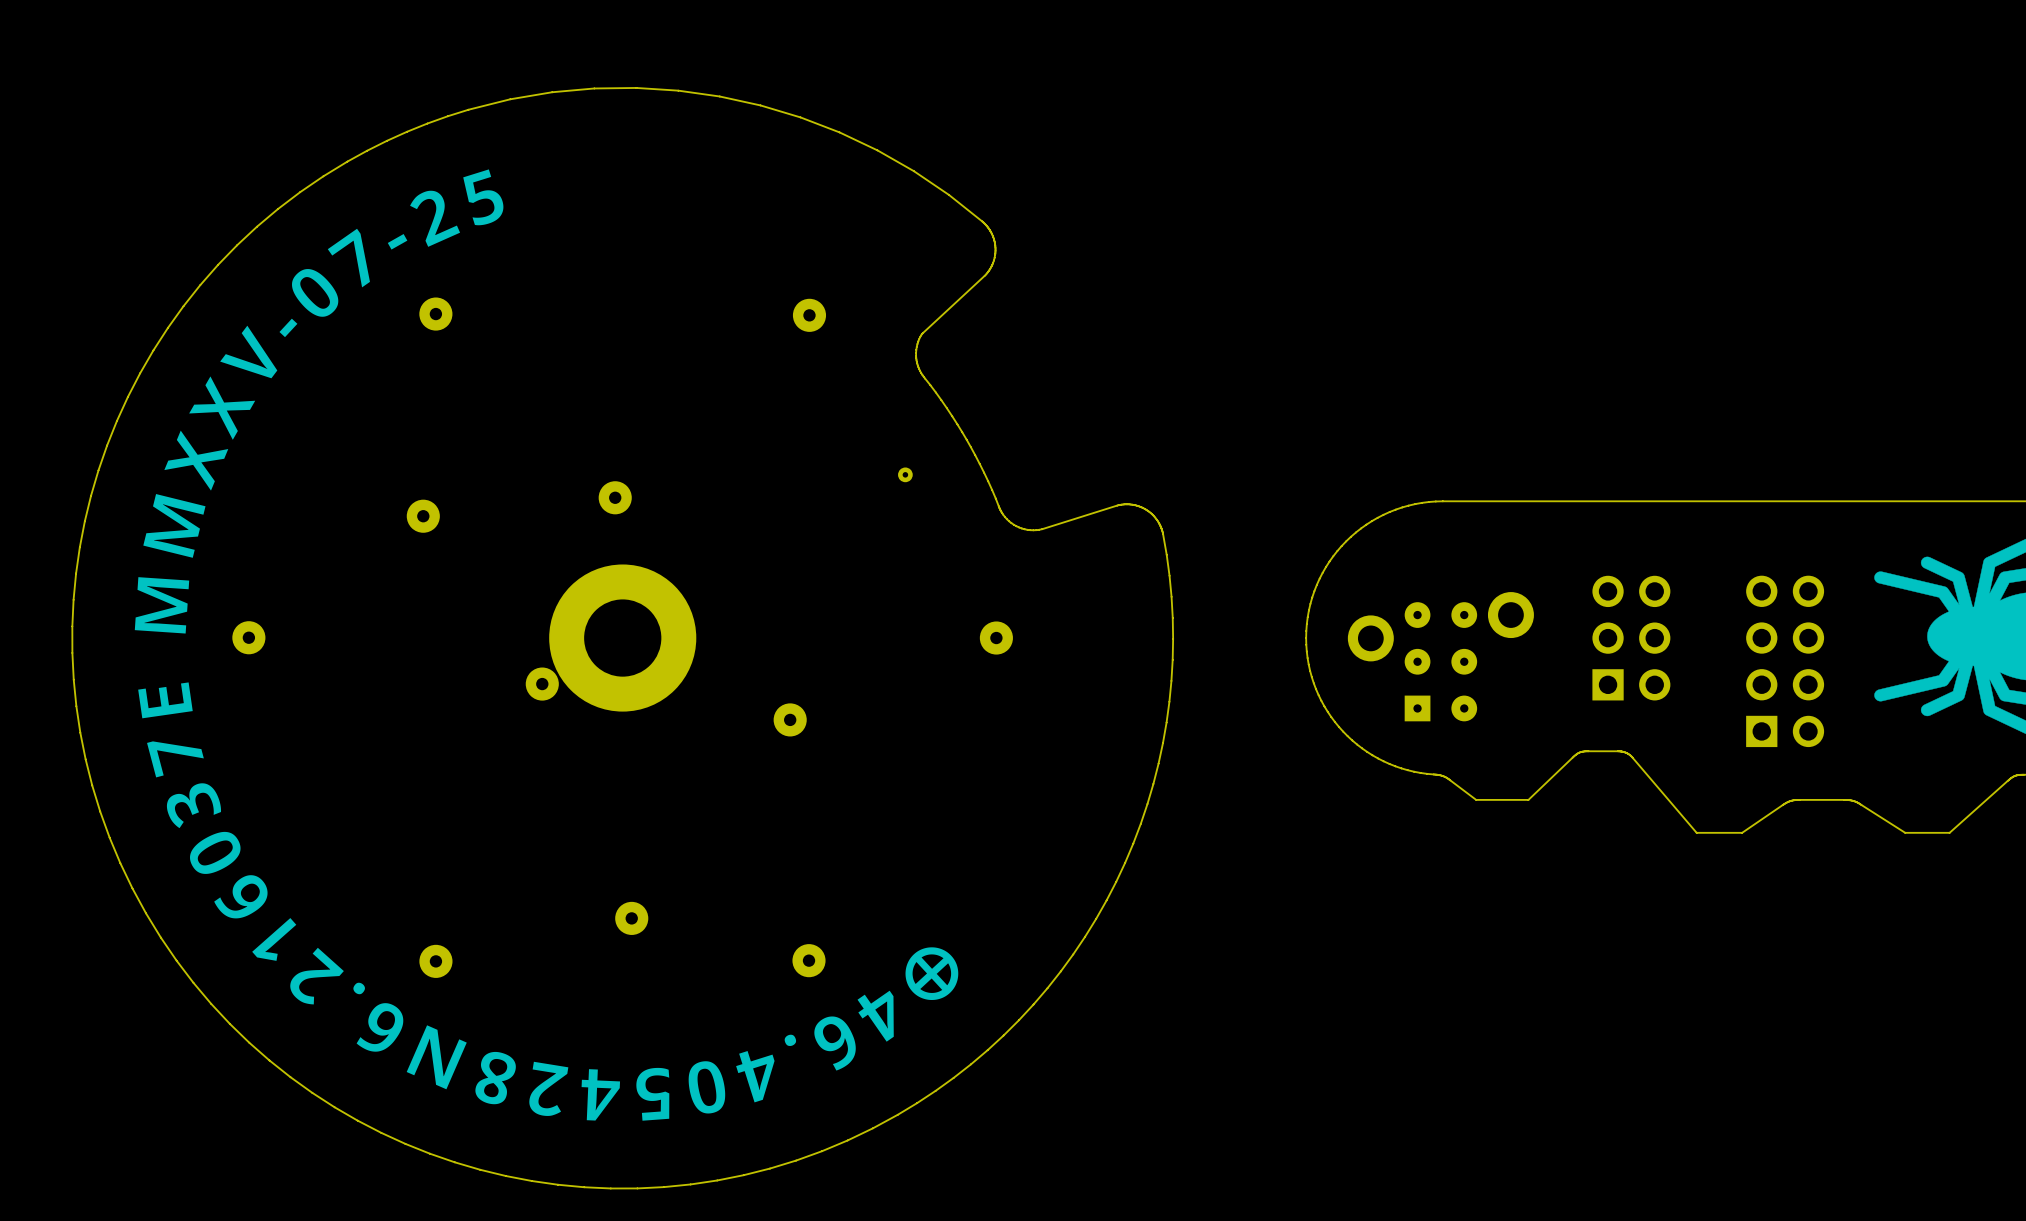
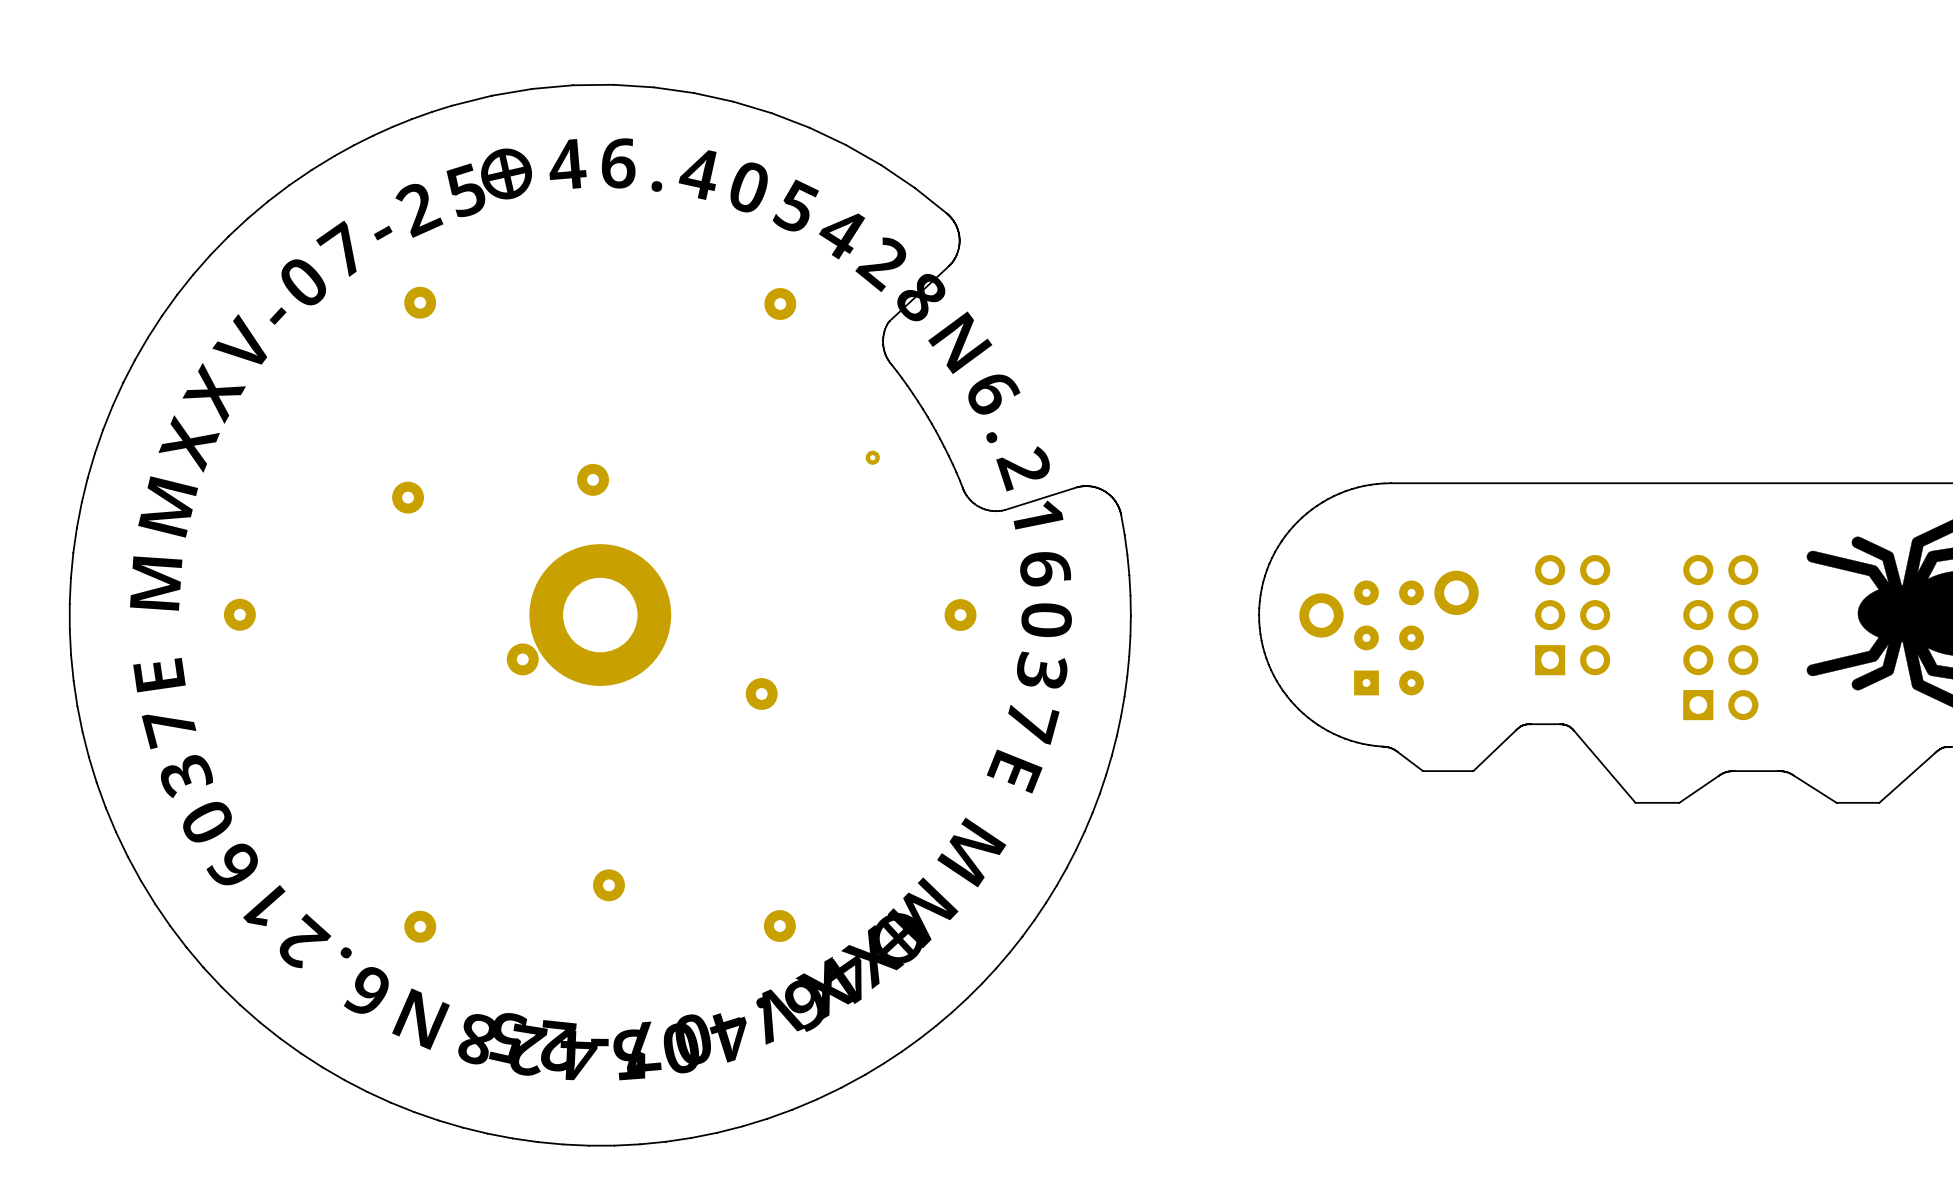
drawing: none -> [481, 138, 1064, 530]
drawing: none -> [986, 552, 1072, 794]
drawing: none -> [488, 817, 1007, 1073]

